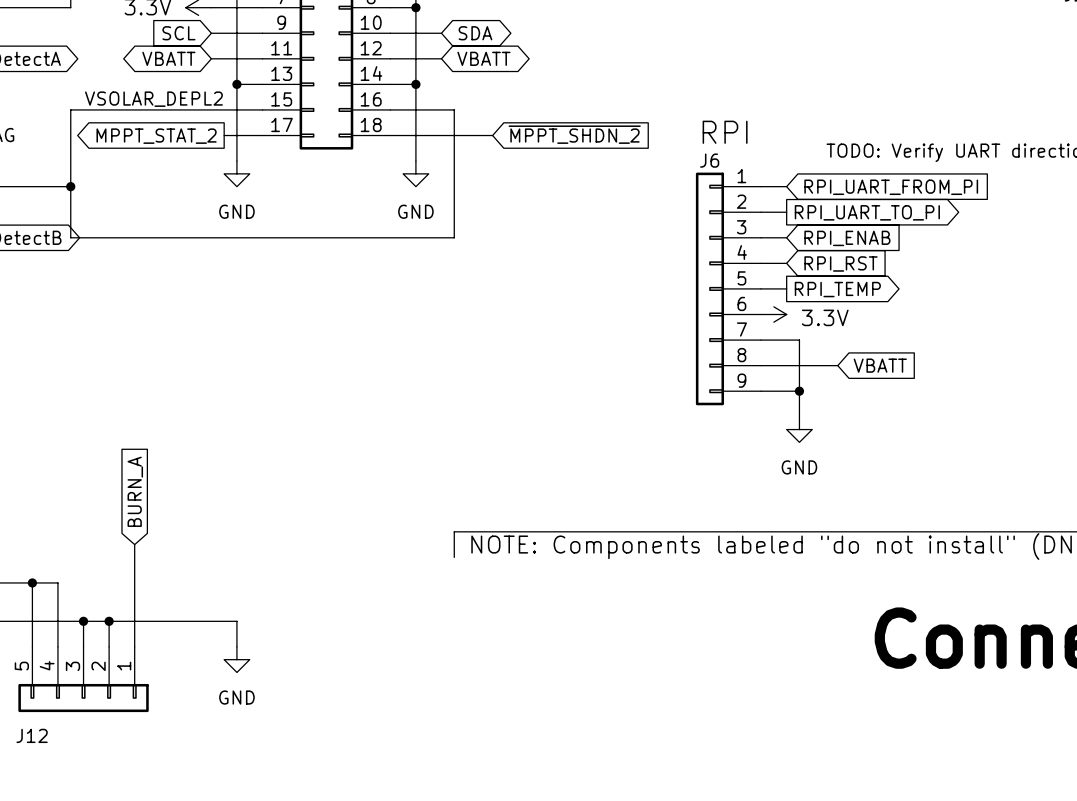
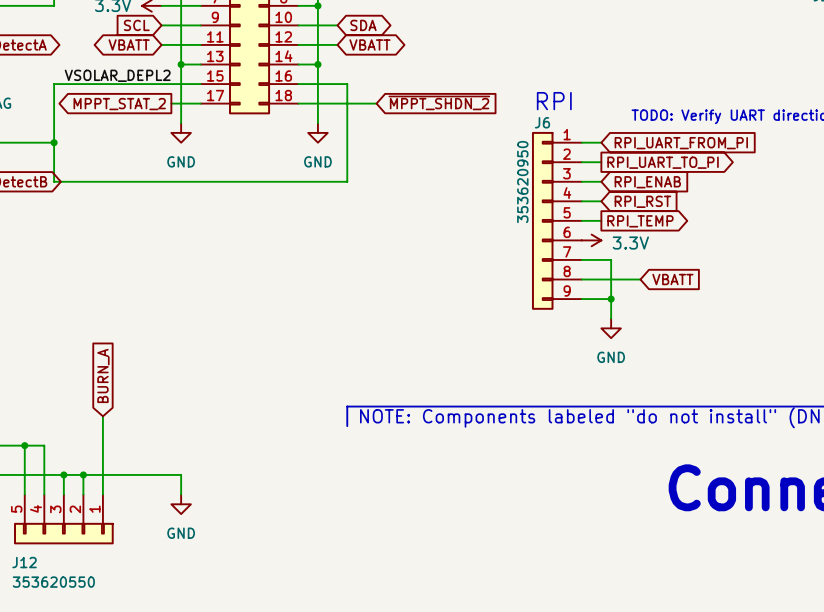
J6 value: none -> 353620950 (522, 182)
J12 value: none -> 353620550 (53, 582)

